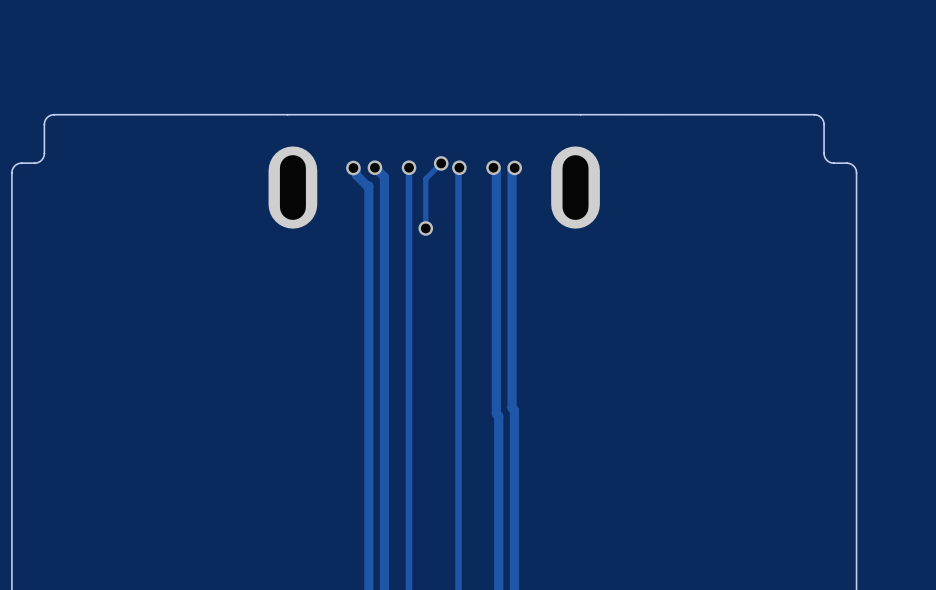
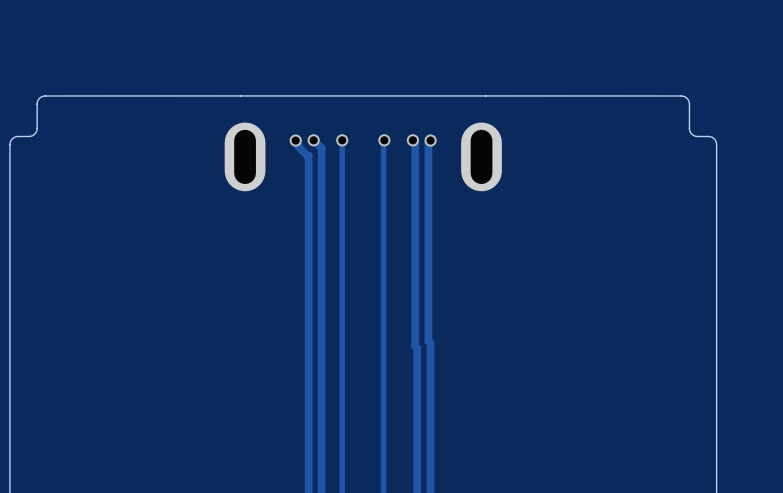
track: (441, 163) (425, 178) (425, 228) -> none
via: (441, 163) -> none
via: (425, 228) -> none

